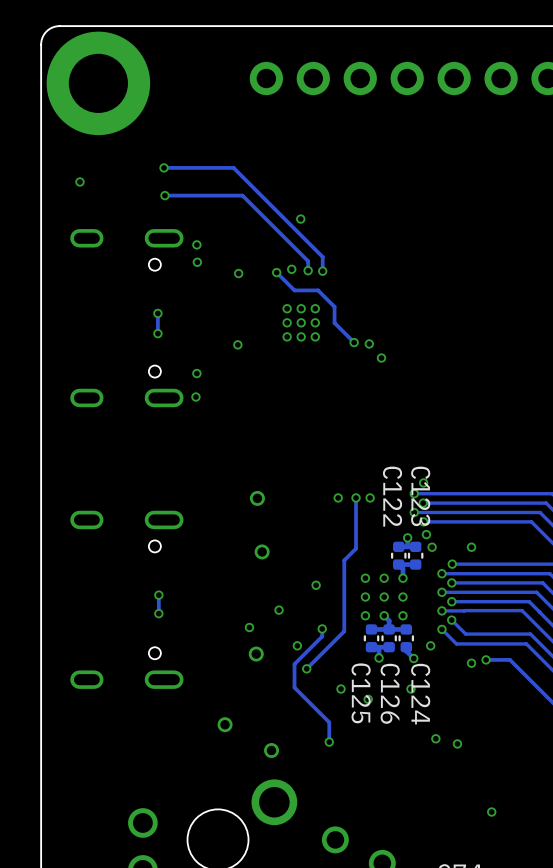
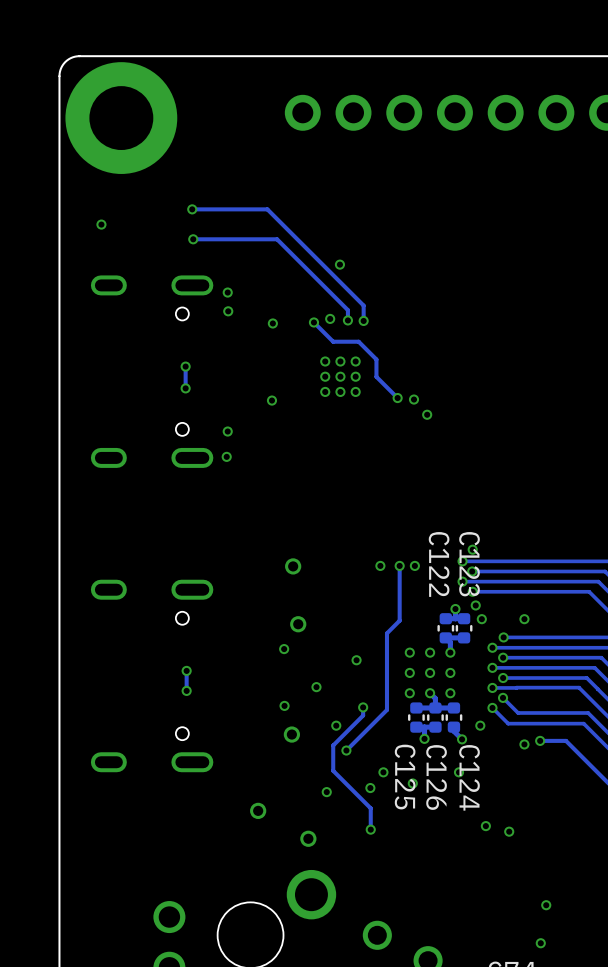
via: none -> (284, 649)
via: none -> (370, 788)
via: none -> (326, 792)
via: none -> (540, 943)

